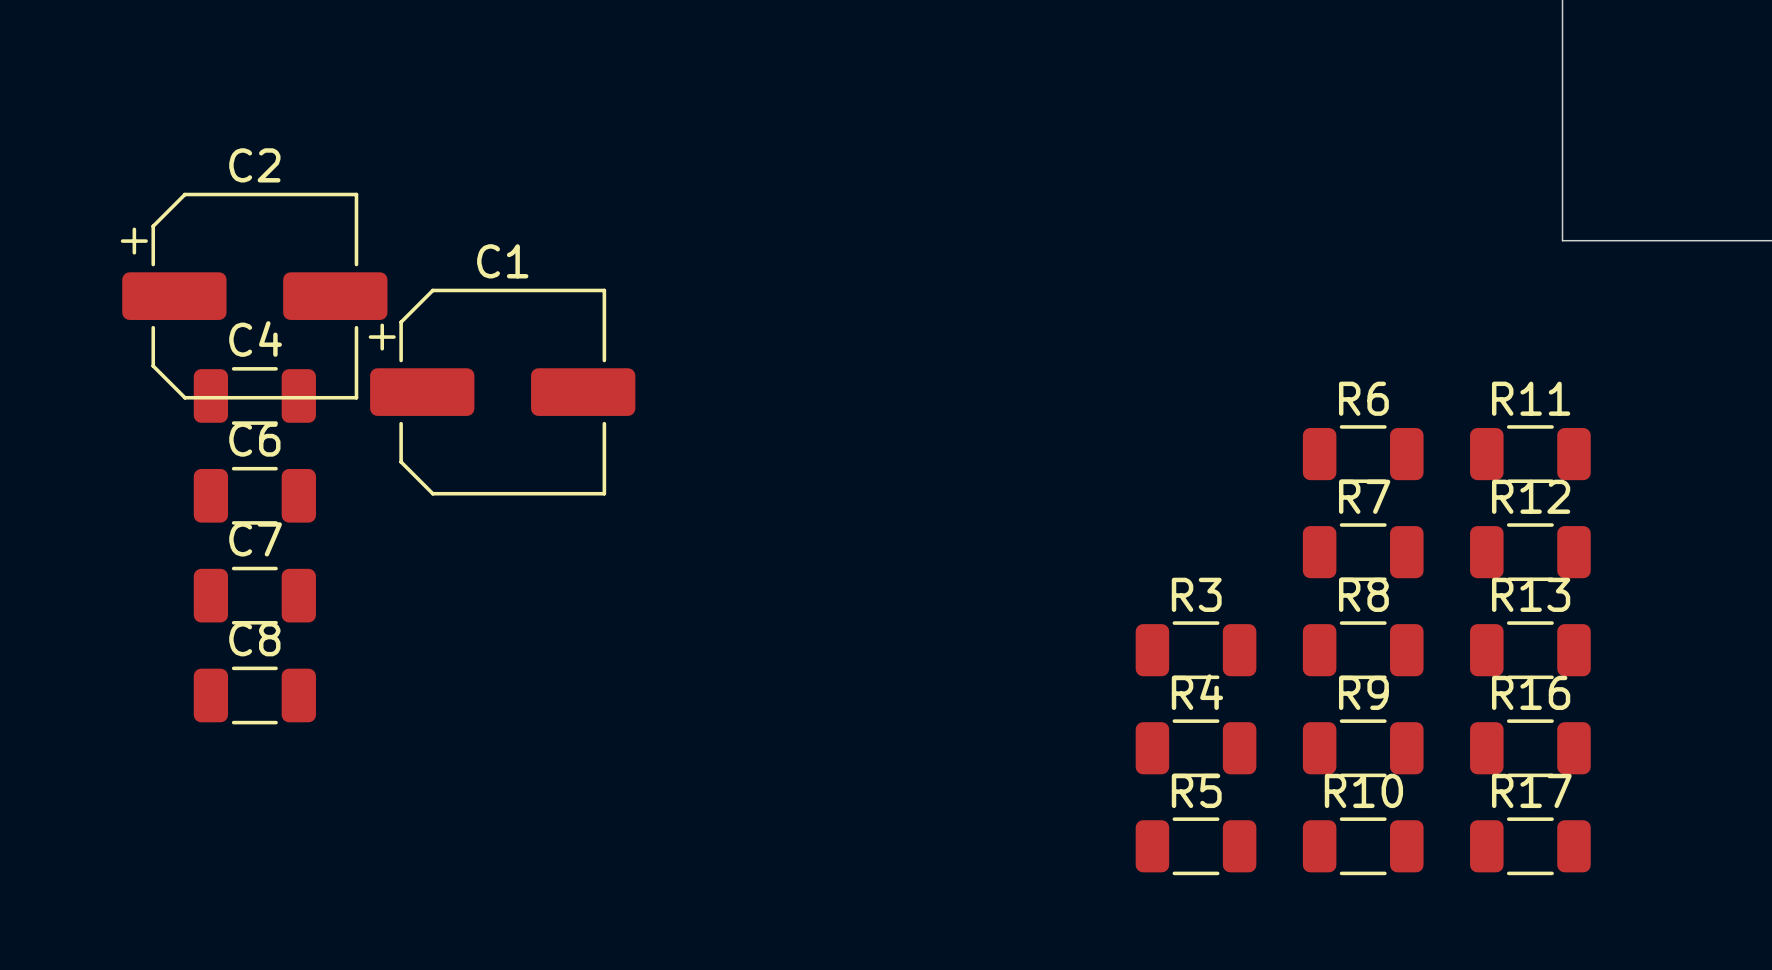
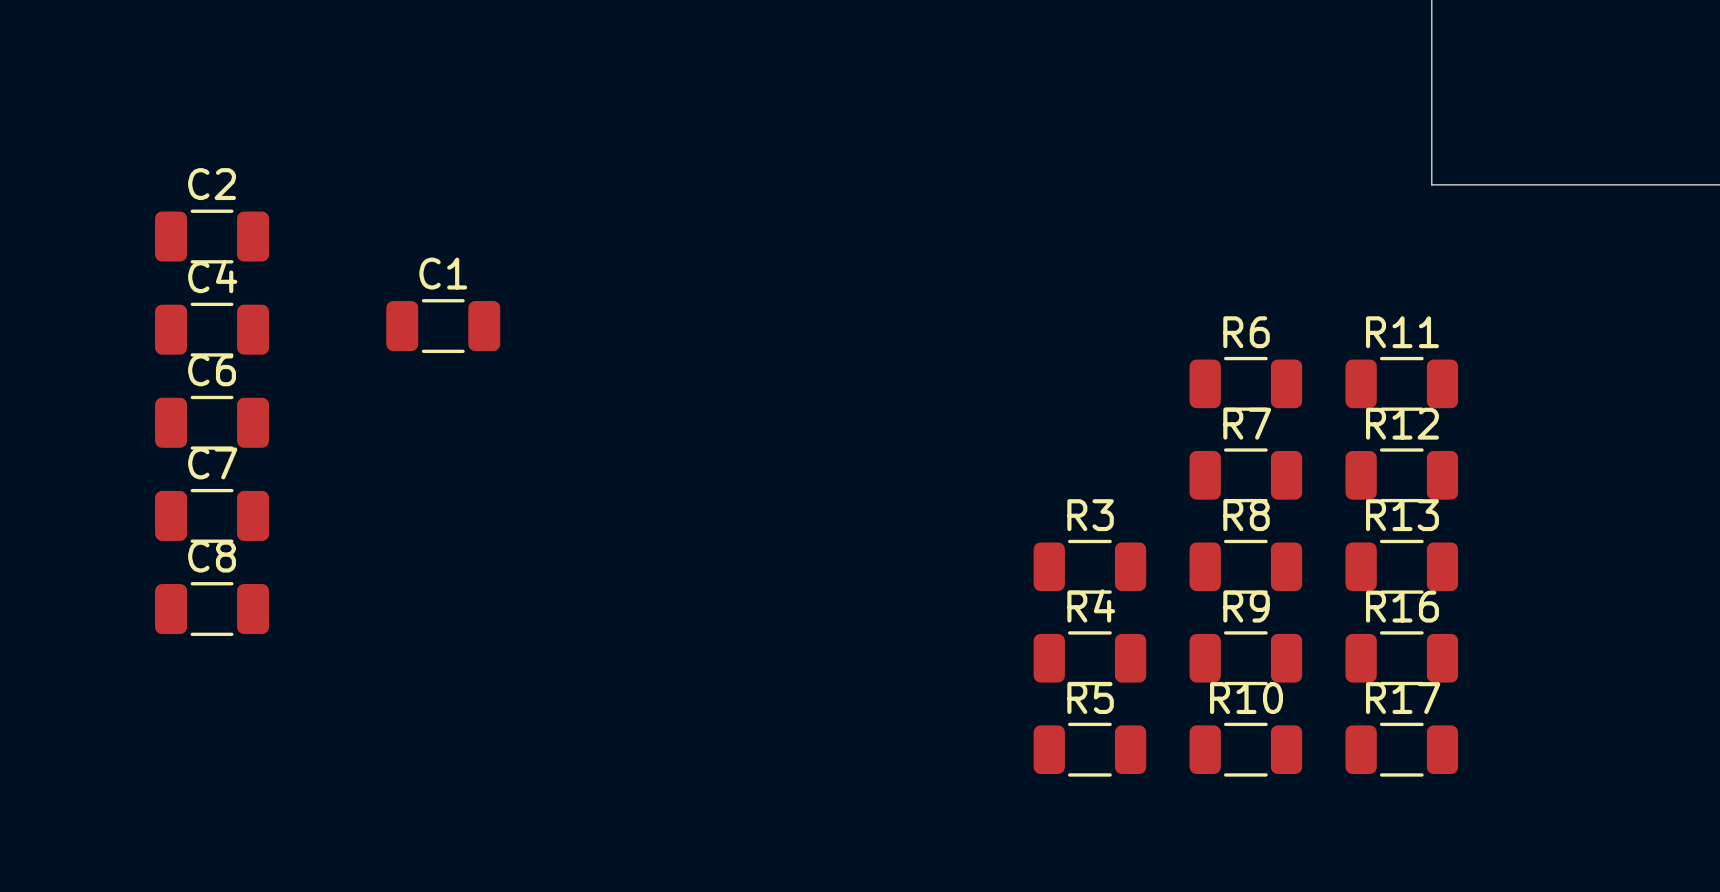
C2 name position: C2 (254, 165) -> C2 (212, 184)
C2 footprint: [120, 192, 388, 400] -> [155, 209, 270, 264]
C1 name position: C1 (502, 261) -> C1 (443, 273)
C1 footprint: [368, 288, 636, 496] -> [386, 299, 501, 354]

